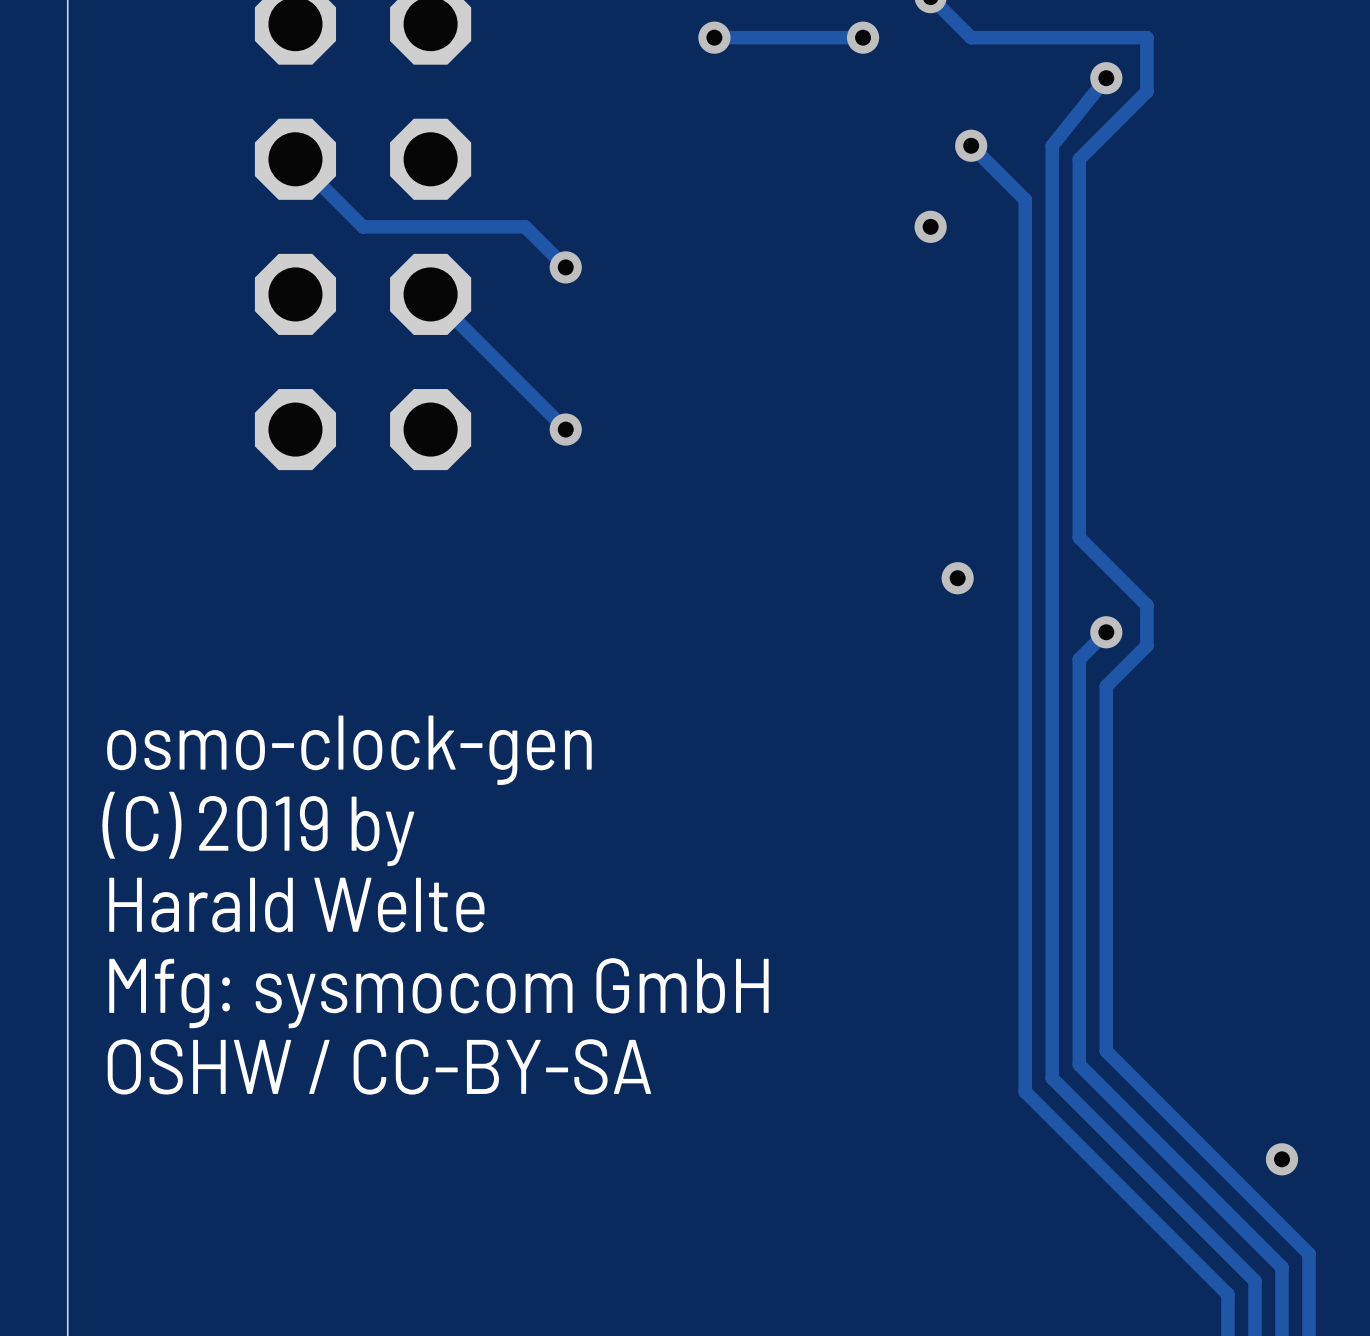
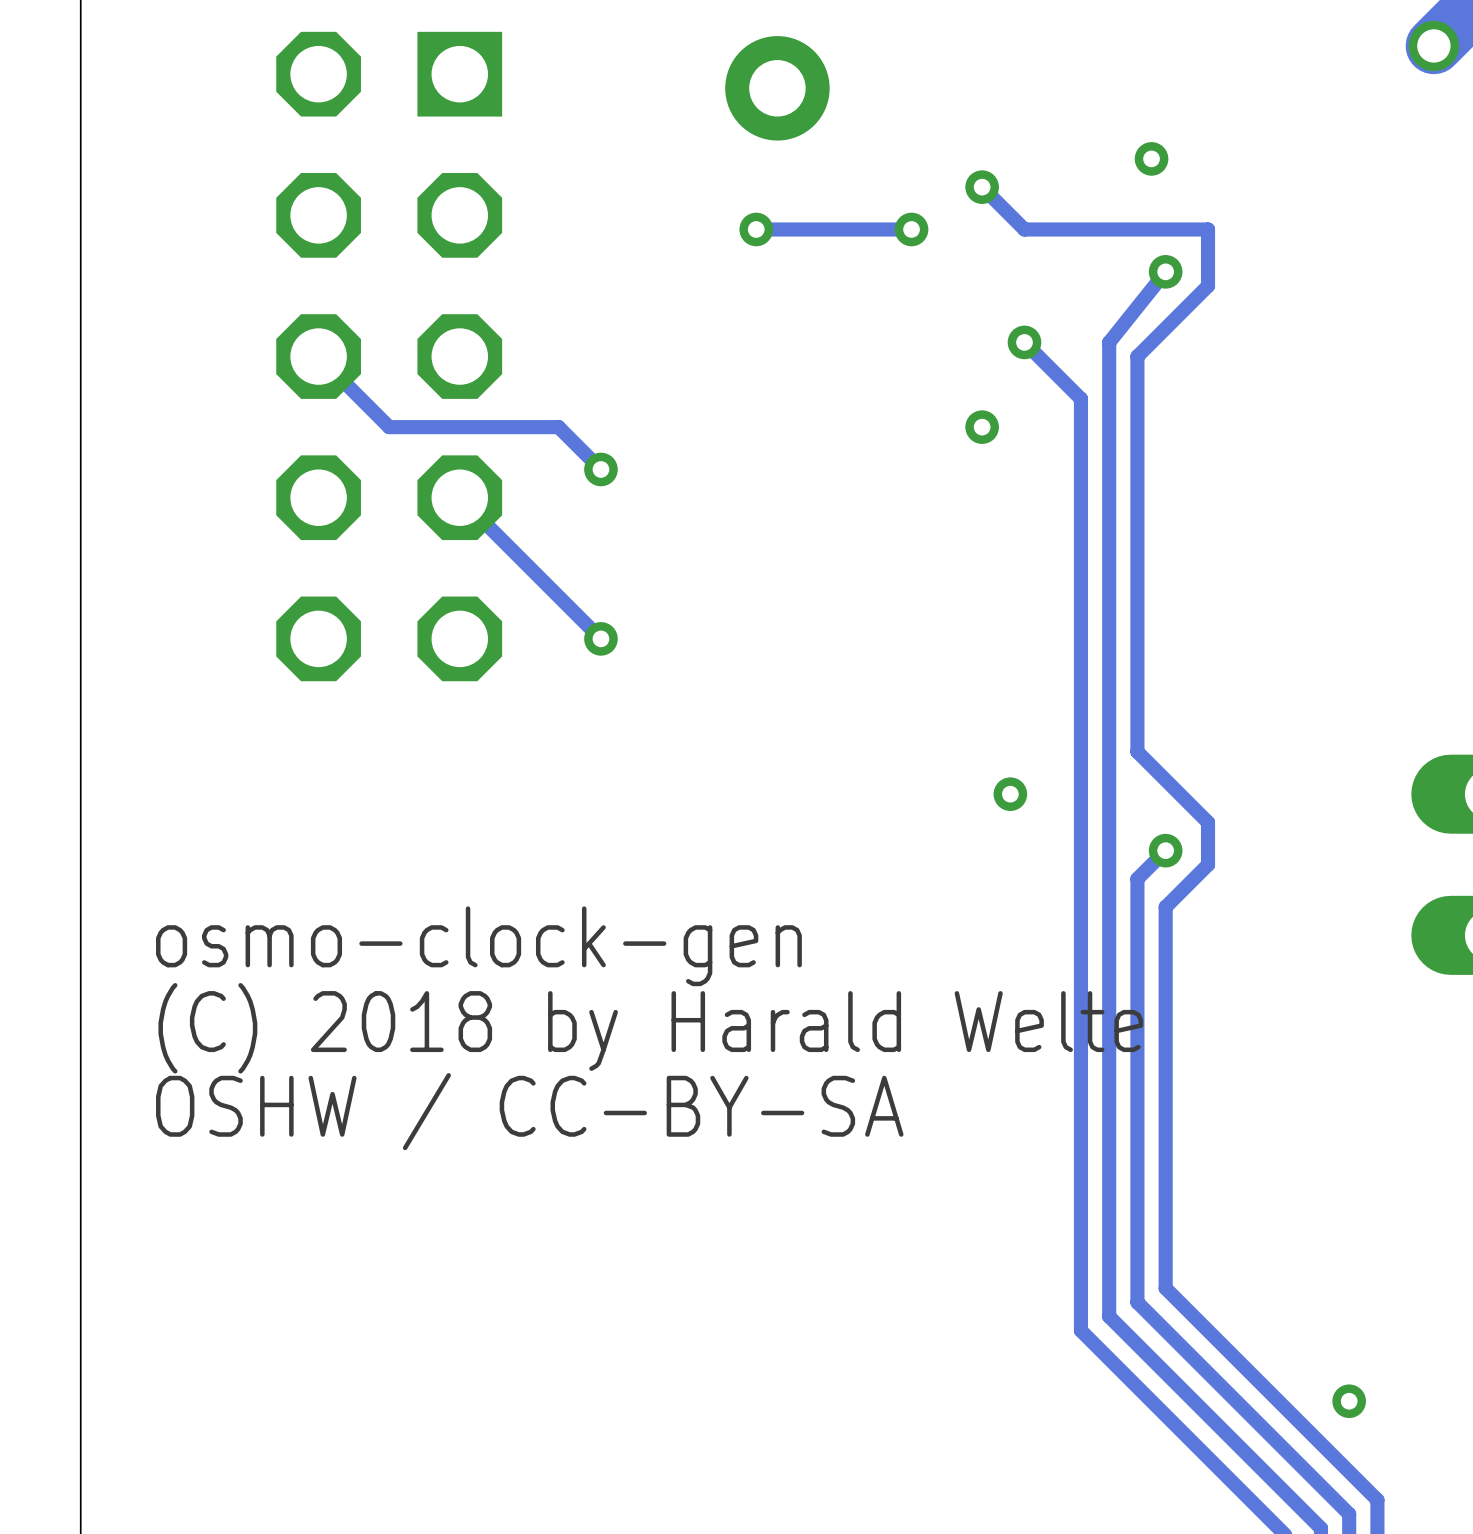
text position: osmo-clock-gen (349, 750) -> osmo-clock-gen (478, 946)
text: (C) 2019 by (258, 828) -> (C) 2018 by Harald Welte (650, 1028)
text: Harald Welte (296, 905) -> none
text: Mfg: sysmocom GmbH (438, 993) -> none
text position: OSHW / CC-BY-SA (379, 1066) -> OSHW / CC-BY-SA (529, 1111)

